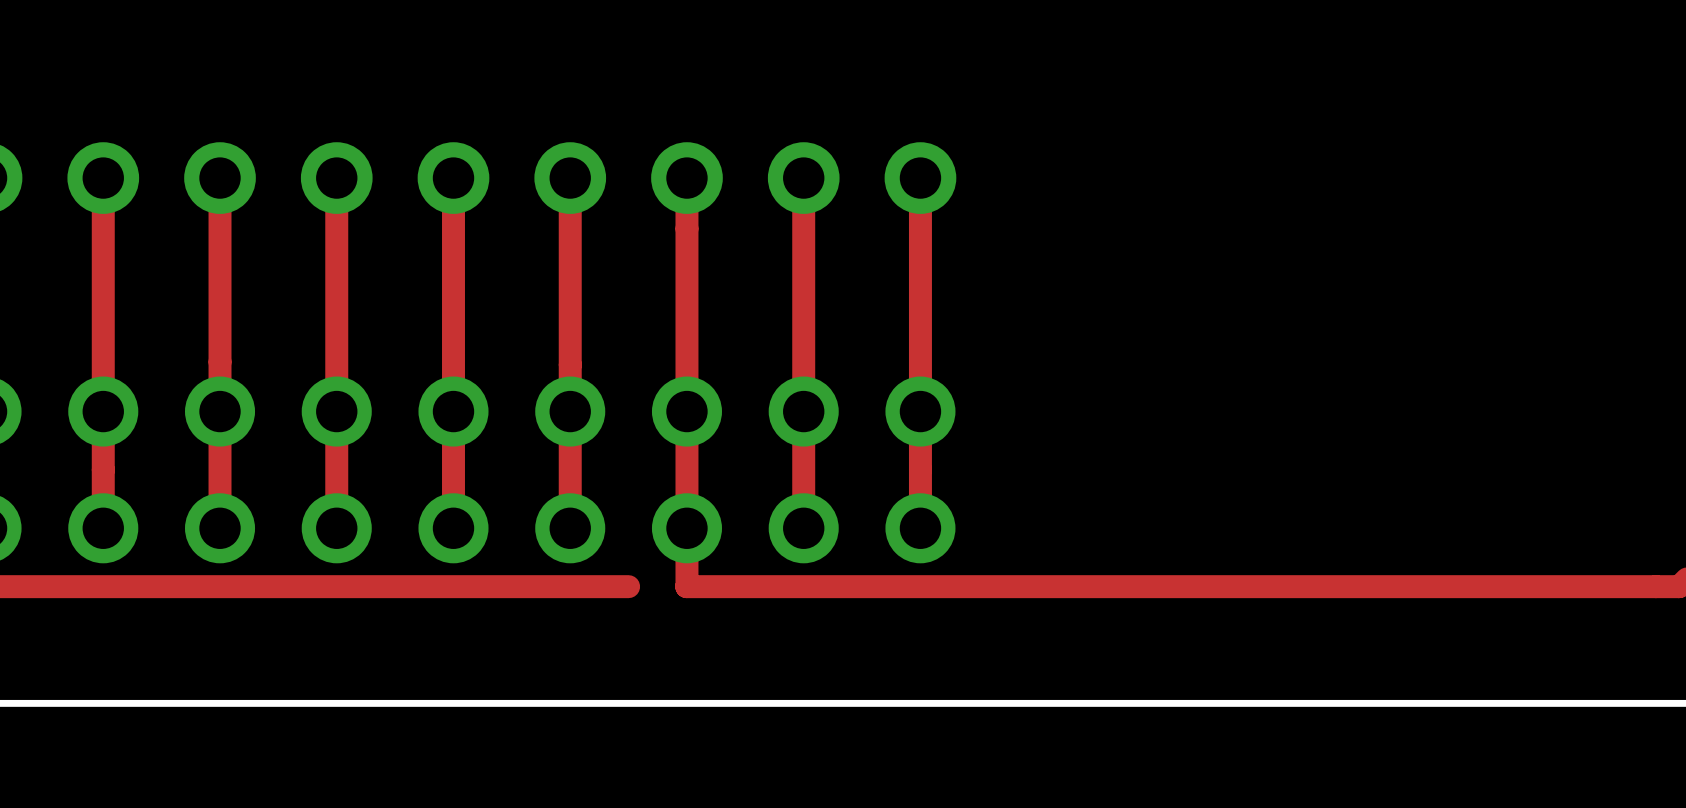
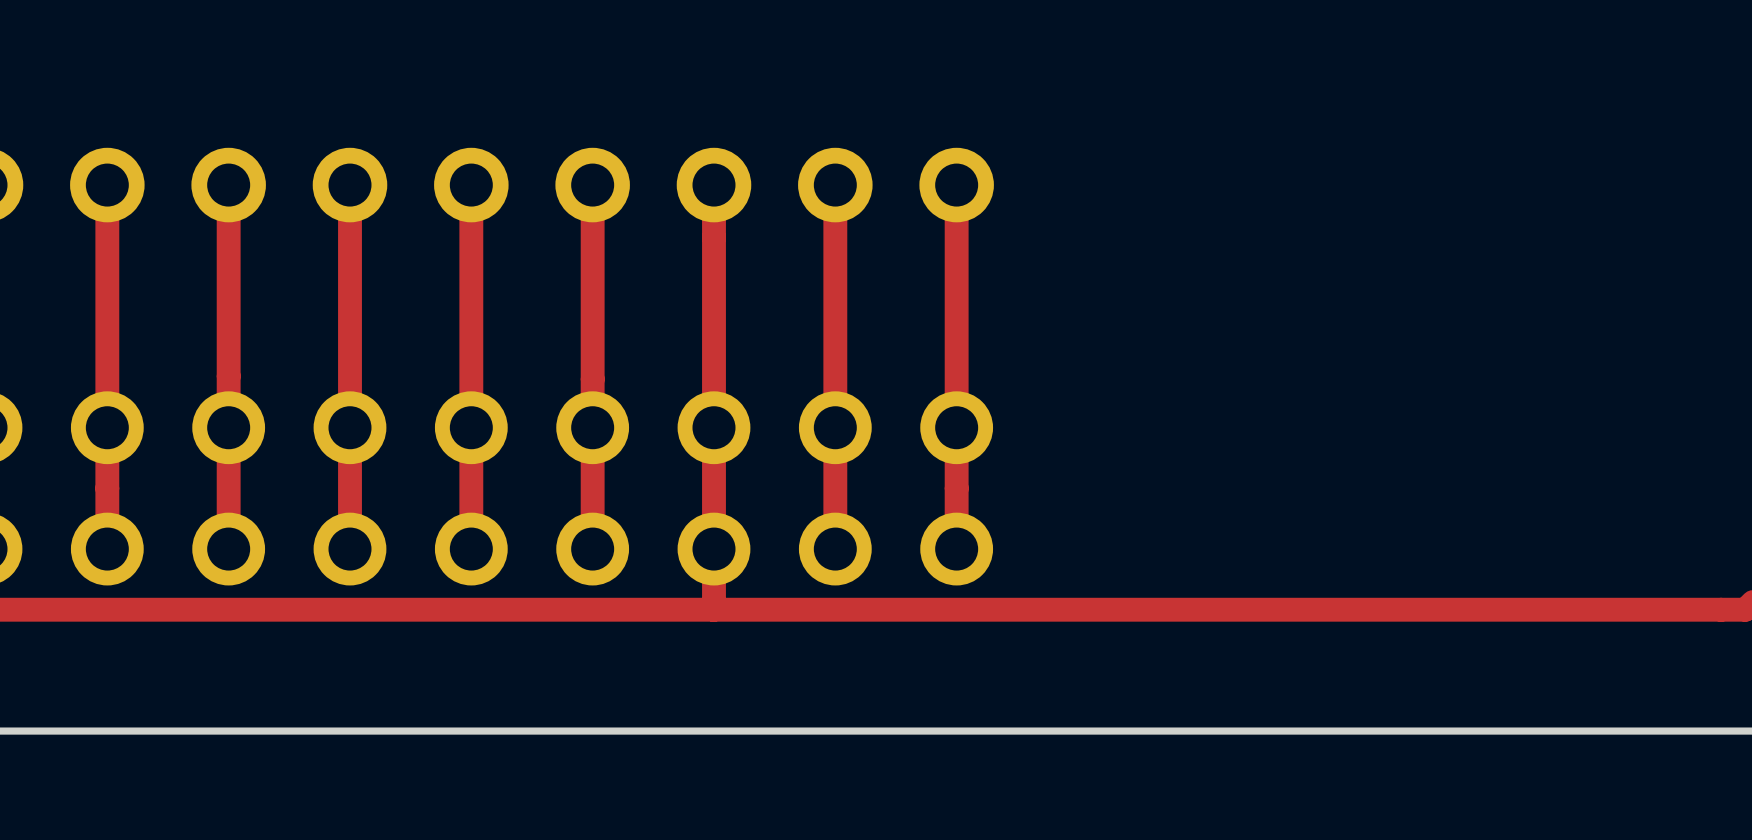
top track: none -> (713, 609) (653, 609)

